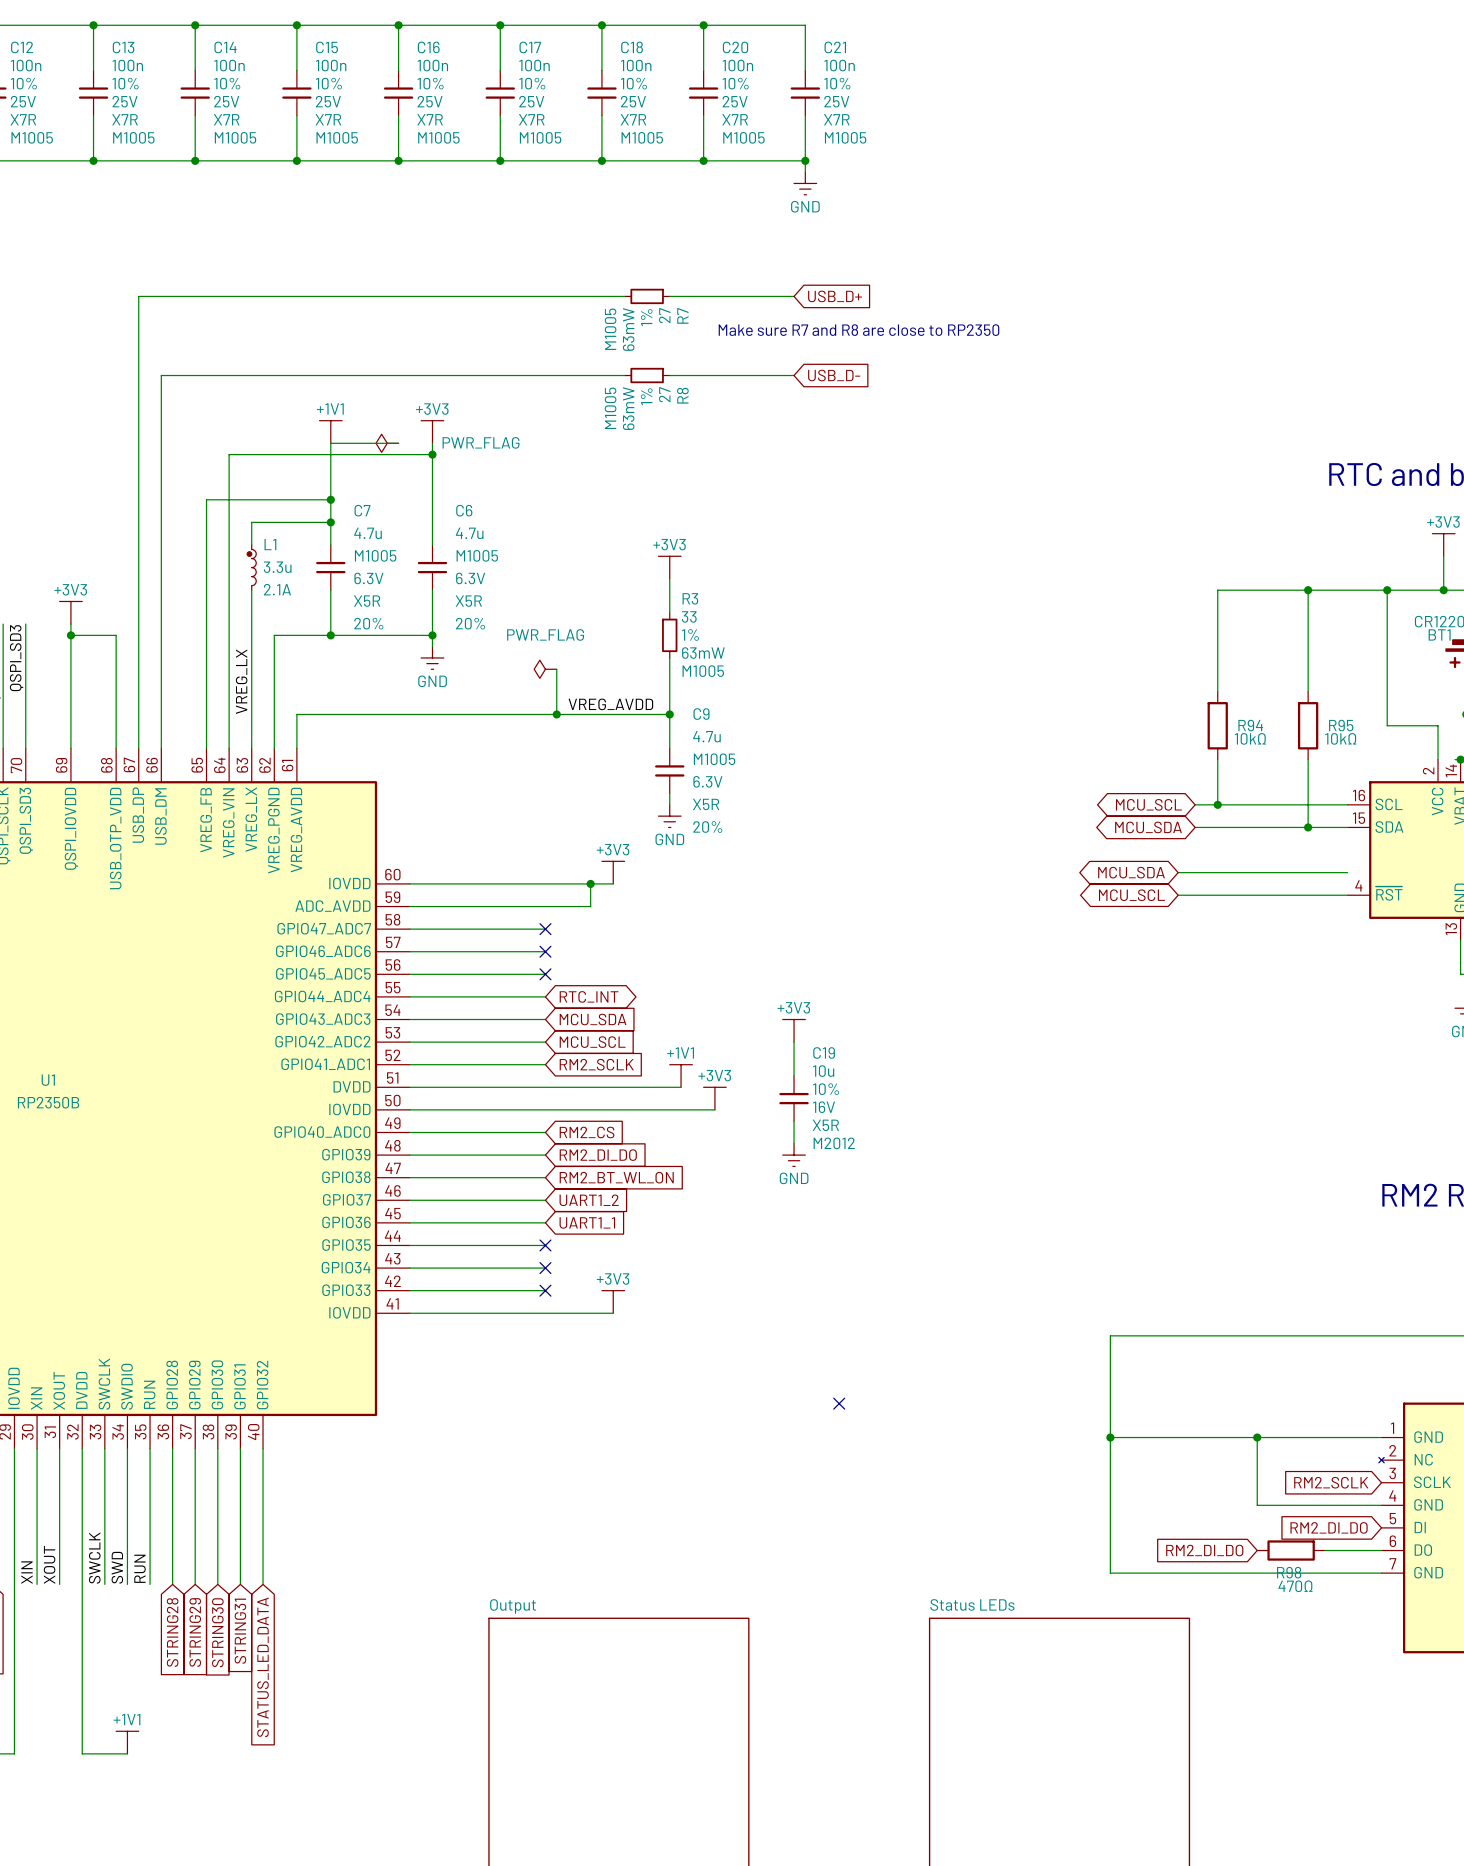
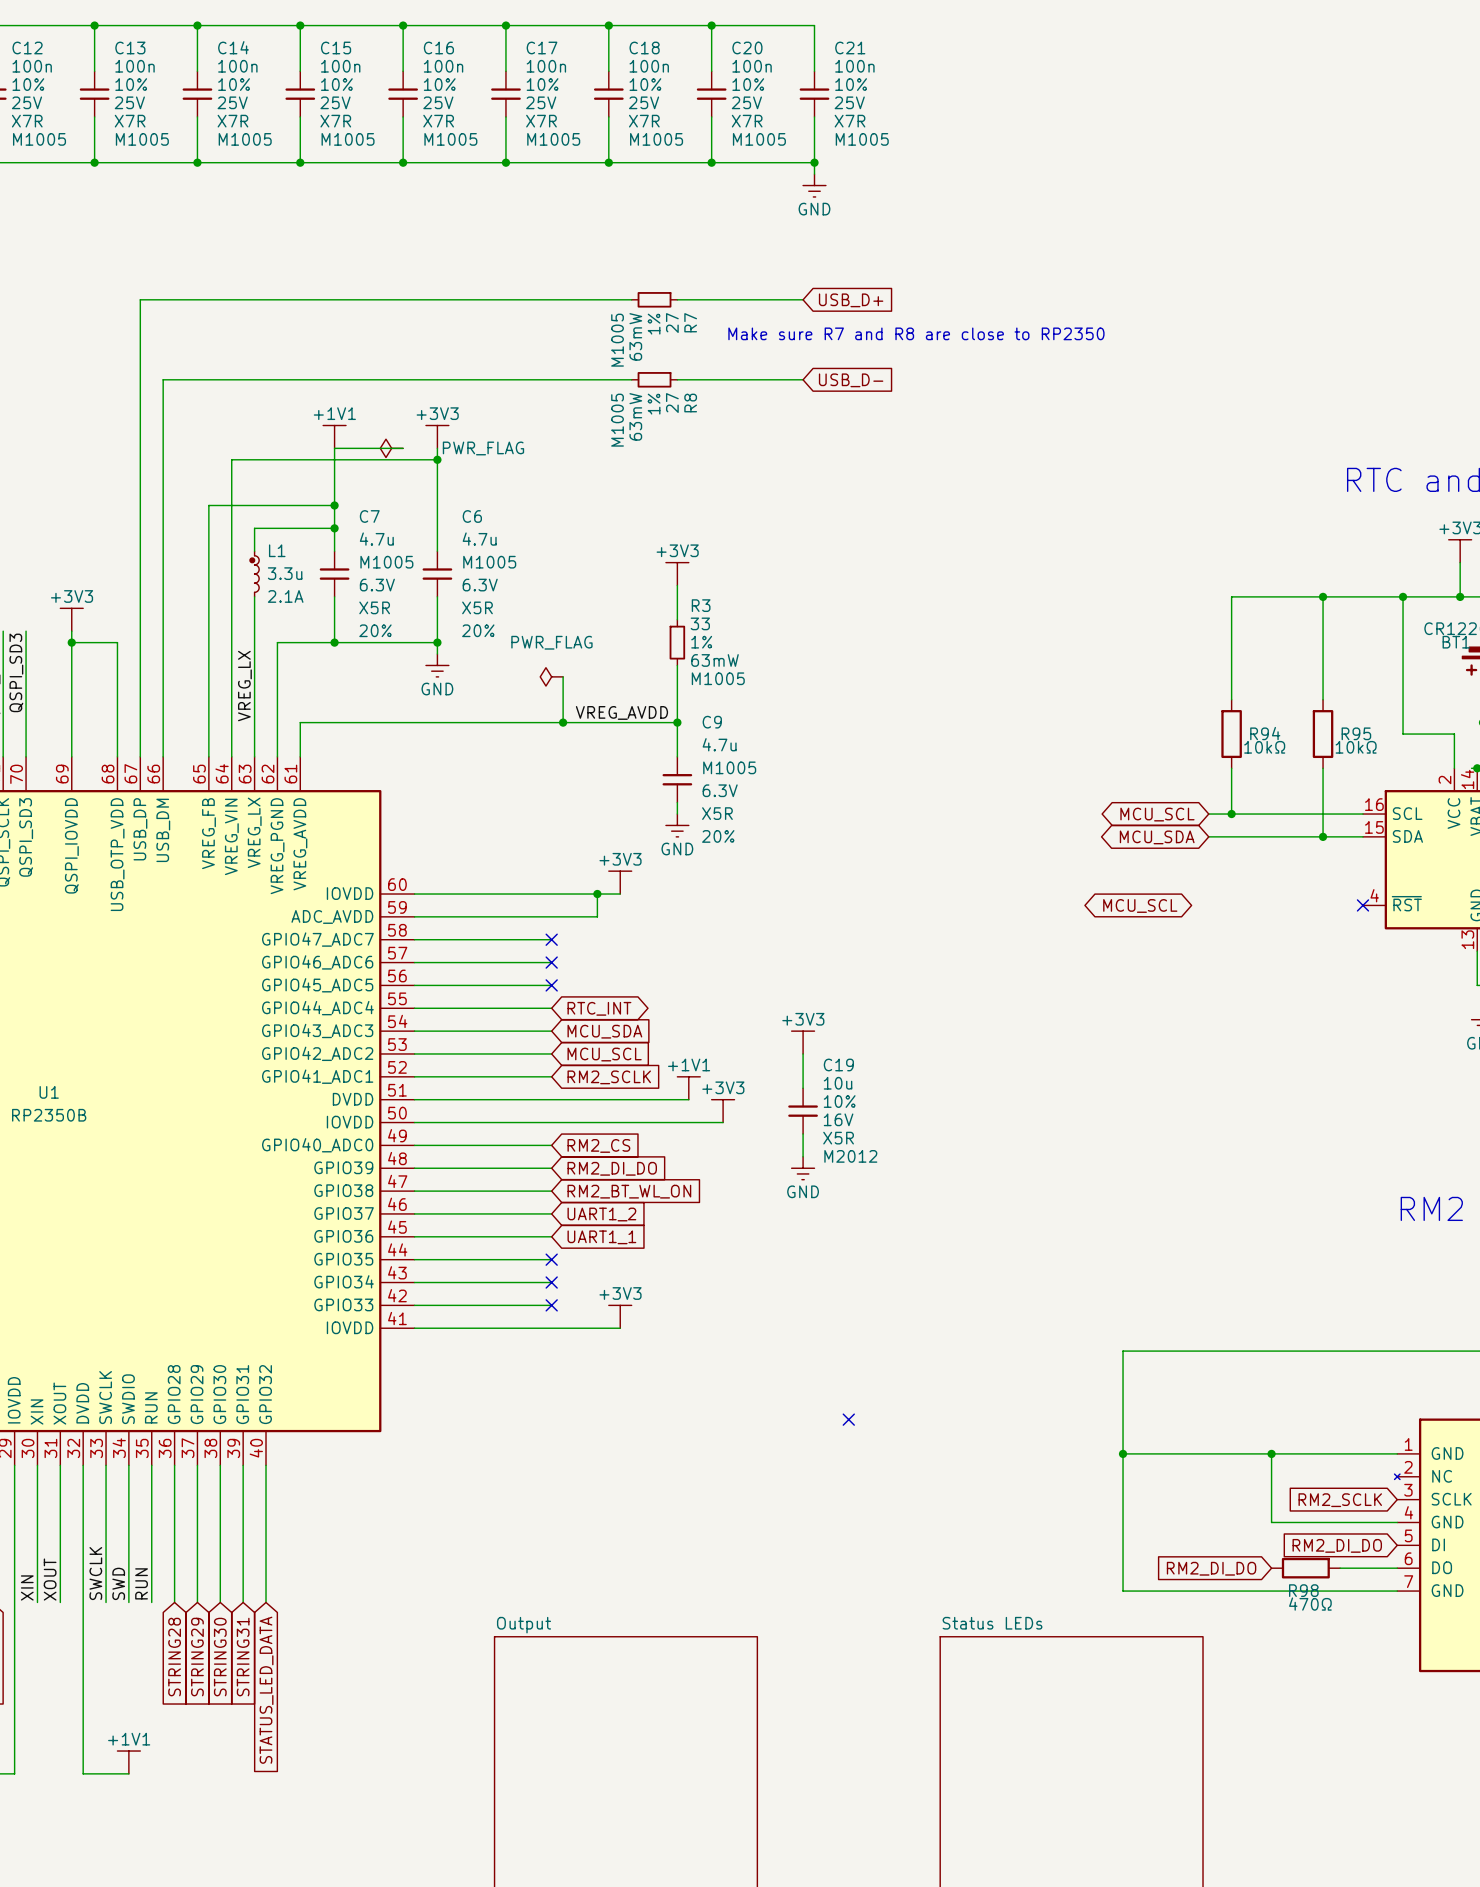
global label: MCU_SDA (1131, 872) -> none
wire: (1178, 872) (1347, 872) -> none
wire: (1178, 895) (1347, 895) -> none
no-connect mark: none -> (1362, 905)

